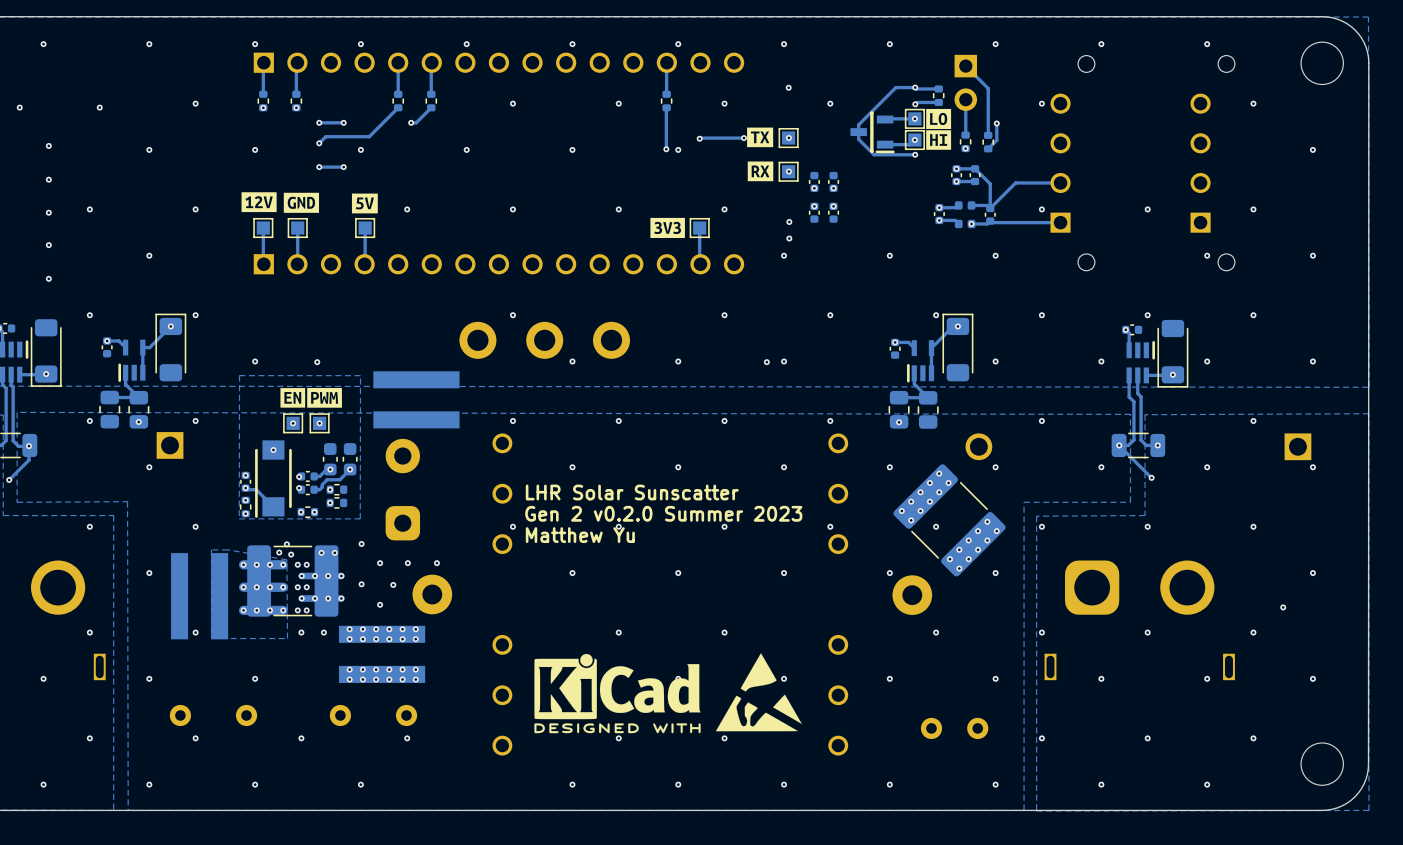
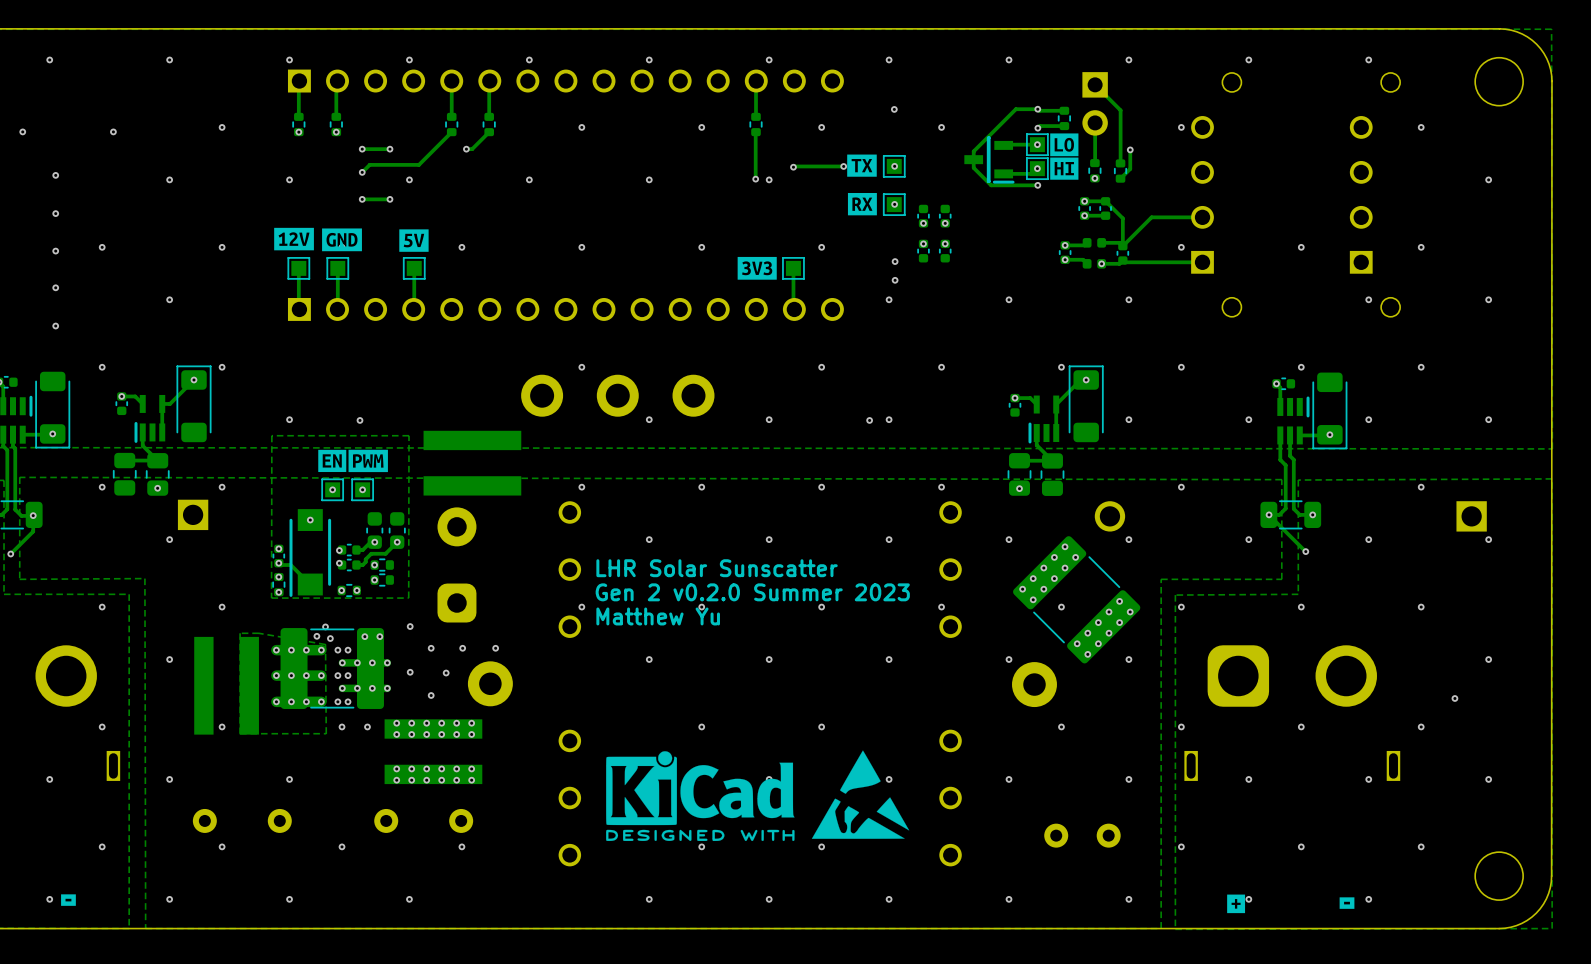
drawing: none -> [61, 894, 76, 906]
drawing: none -> [1227, 894, 1246, 914]
drawing: none -> [1339, 897, 1355, 909]

